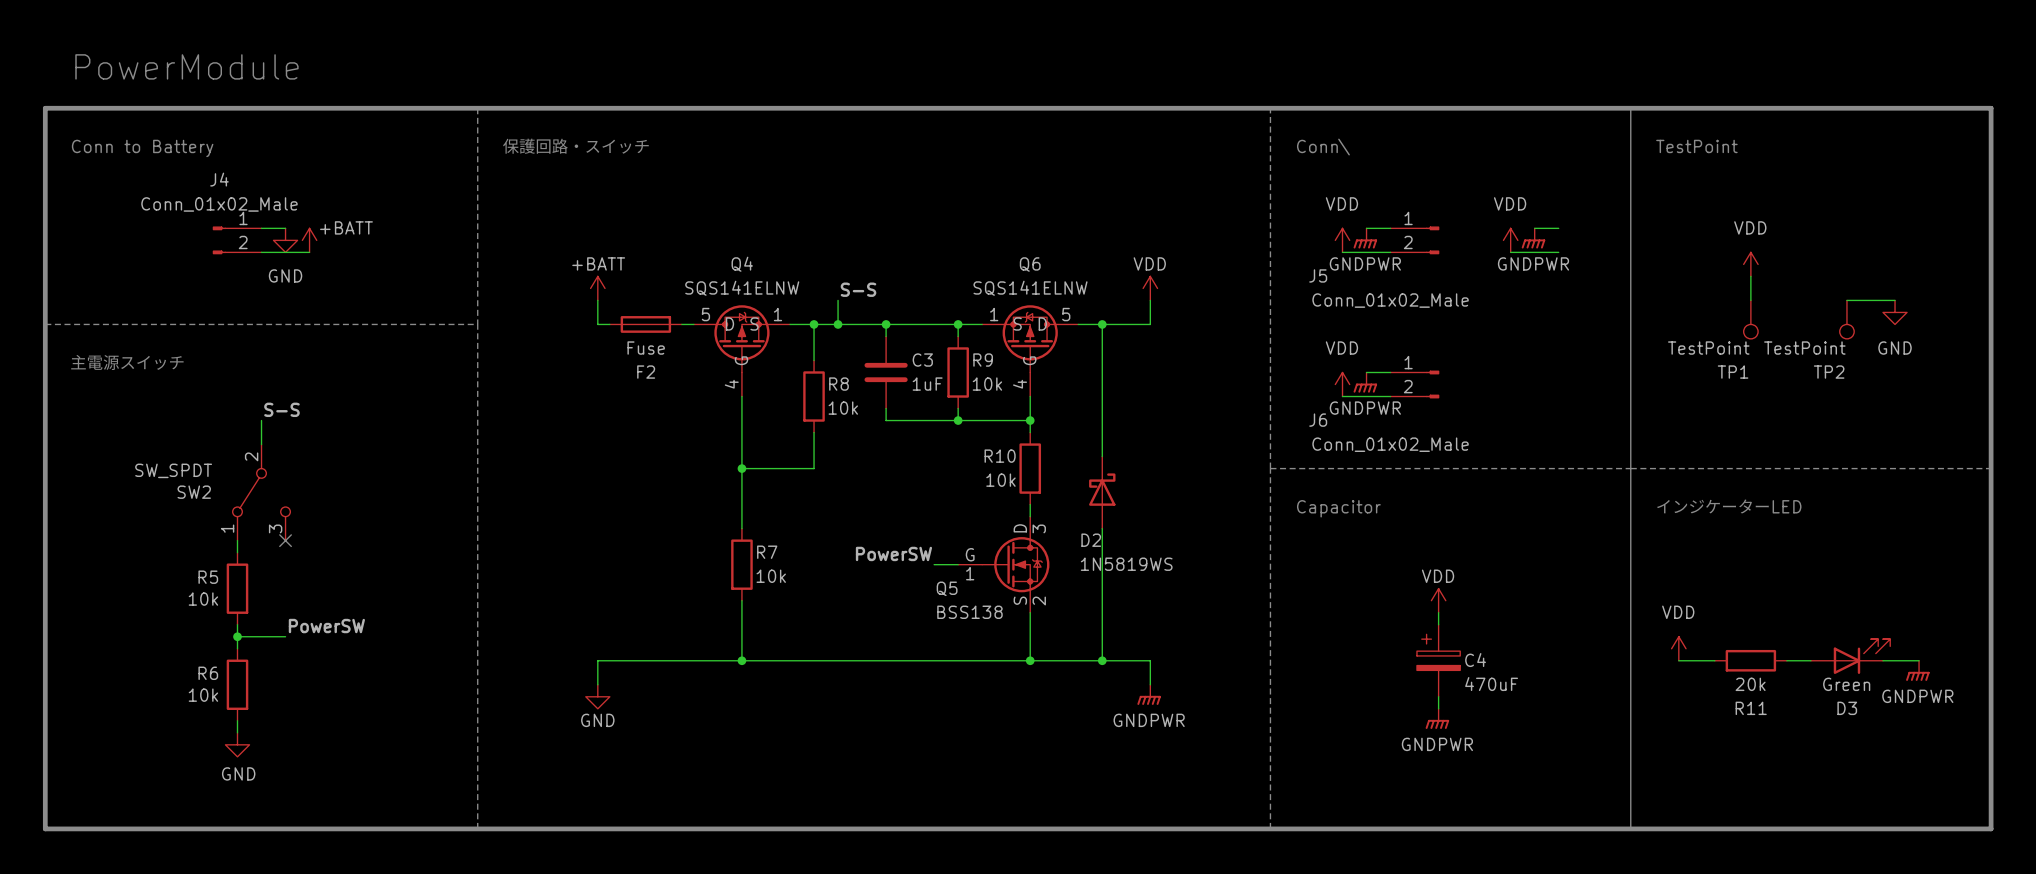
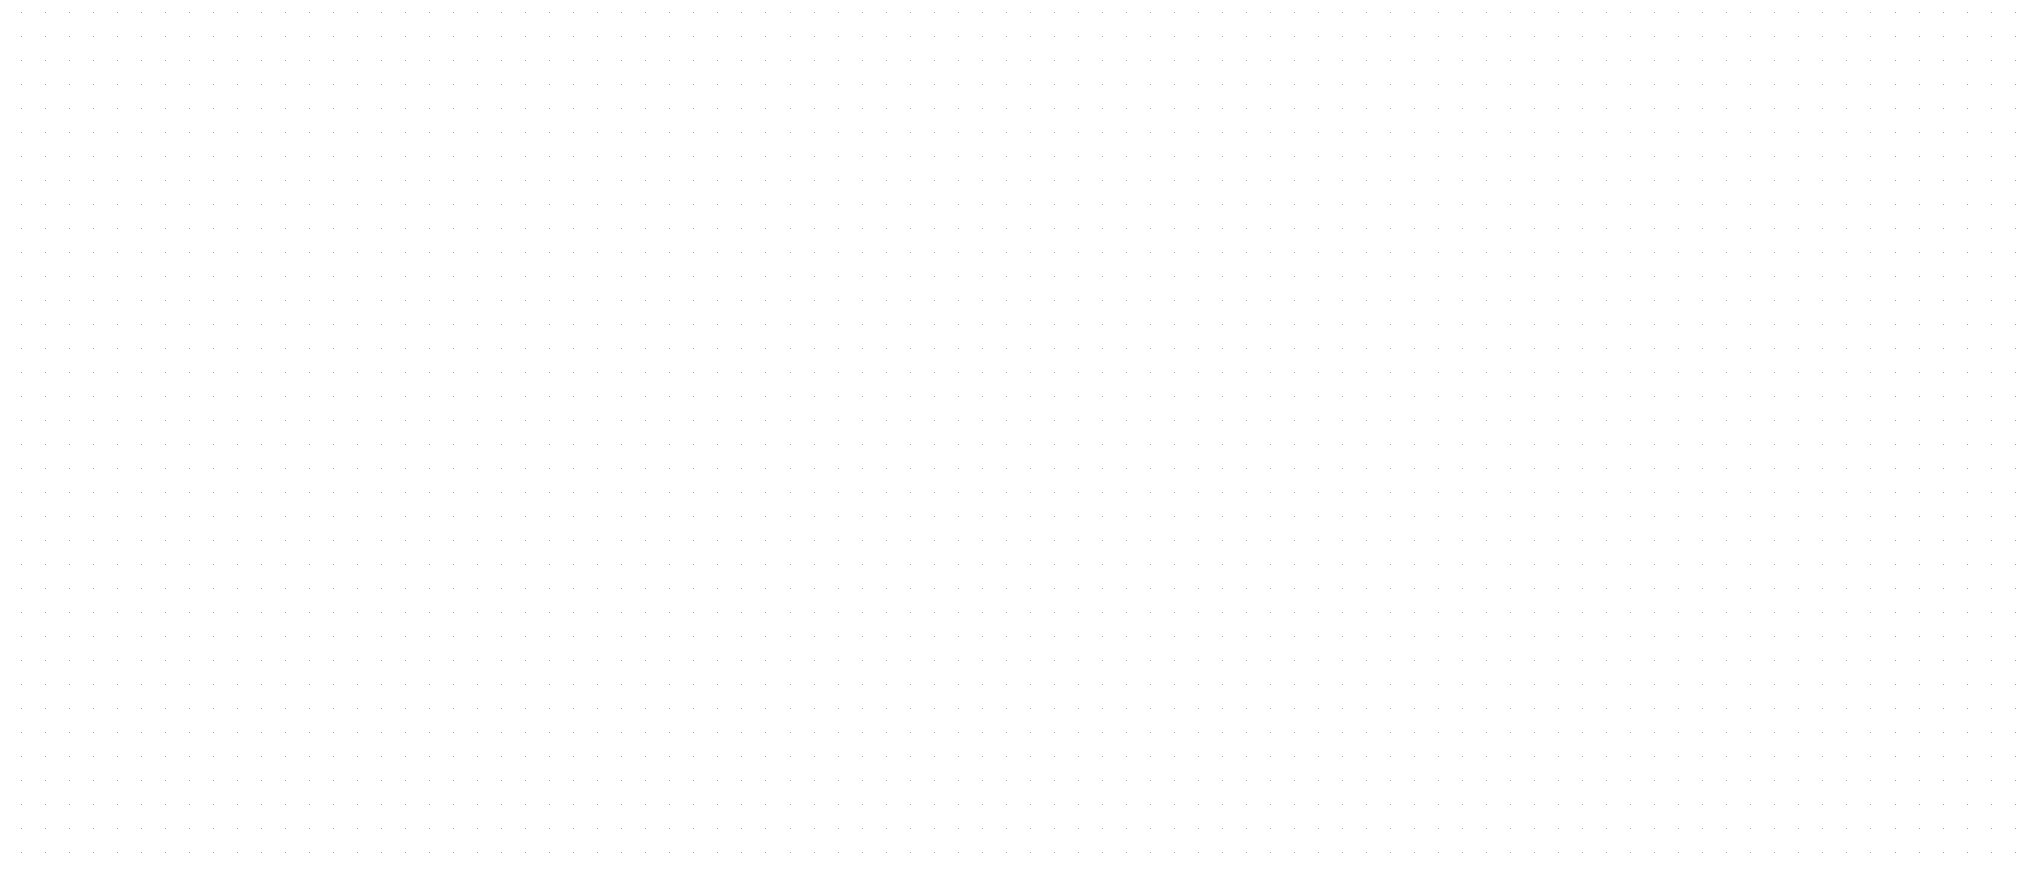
text: PowerModule (186, 66) -> none
line: (45, 108) (1991, 108) (1991, 828) (45, 828) (45, 108) -> none
line: (477, 108) (477, 828) -> none
line: (1270, 108) (1270, 828) -> none
line: (1630, 108) (1630, 828) -> none
text: 保護回路・スイッチ (575, 146) -> none
text: TestPoint (1696, 146) -> none
text: Conn\ (1323, 147) -> none
text: Conn to Battery (142, 148) -> none
wire: (261, 228) (285, 228) -> none
wire: (1366, 228) (1390, 228) -> none
wire: (1534, 228) (1558, 228) -> none
power symbol: GNDPWR (1365, 238) -> none
power symbol: GNDPWR (1533, 238) -> none
J4: Conn_01x02_Male (237, 240) -> none
power symbol: GND (285, 240) -> none
power symbol: +BATT (309, 240) -> none
power symbol: VDD (1342, 240) -> none
J5: Conn_01x02_Male (1414, 240) -> none
power symbol: VDD (1510, 240) -> none
wire: (261, 252) (309, 252) -> none
wire: (1342, 252) (1390, 252) -> none
wire: (1510, 252) (1558, 252) -> none
power symbol: VDD (1750, 264) -> none
wire: (1750, 276) (1750, 300) -> none
power symbol: +BATT (597, 288) -> none
power symbol: VDD (1150, 288) -> none
label: S-S (858, 289) -> none
wire: (597, 300) (597, 324) (609, 324) -> none
wire: (838, 300) (838, 324) -> none
wire: (1150, 300) (1150, 324) (1078, 324) -> none
wire: (1846, 300) (1895, 300) -> none
power symbol: GND (1895, 312) -> none
TP1: TestPoint (1750, 319) -> none
TP2: TestPoint (1846, 319) -> none
line: (45, 324) (477, 324) -> none
F2: Fuse (645, 324) -> none
wire: (681, 324) (693, 324) -> none
wire: (790, 324) (982, 324) -> none
wire: (814, 324) (814, 360) -> none
junction: (814, 324) -> none
junction: (838, 324) -> none
wire: (886, 324) (886, 336) -> none
junction: (886, 324) -> none
wire: (958, 324) (958, 336) -> none
junction: (958, 324) -> none
wire: (1102, 324) (1102, 456) -> none
junction: (1102, 324) -> none
Q4: SQS141ELNW (741, 350) -> none
Q6: SQS141ELNW (1030, 350) -> none
text: 主電源スイッチ (127, 362) -> none
C3: 1uF (886, 372) -> none
R9: 10k (958, 372) -> none
wire: (1366, 372) (1390, 372) -> none
power symbol: GNDPWR (1365, 382) -> none
power symbol: VDD (1342, 384) -> none
J6: Conn_01x02_Male (1414, 384) -> none
wire: (741, 396) (741, 528) -> none
R8: 10k (814, 396) -> none
wire: (1030, 396) (1030, 432) -> none
wire: (1342, 396) (1390, 396) -> none
wire: (886, 408) (886, 420) (1030, 420) -> none
wire: (958, 408) (958, 420) -> none
label: S-S (281, 409) -> none
wire: (261, 420) (261, 444) -> none
junction: (958, 420) -> none
junction: (1030, 420) -> none
wire: (814, 432) (814, 468) (741, 468) -> none
junction: (741, 468) -> none
R10: 10k (1030, 468) -> none
line: (1270, 468) (1991, 468) -> none
SW2: SW_SPDT (261, 492) -> none
D2: 1N5819WS (1102, 492) -> none
wire: (1030, 504) (1030, 516) -> none
text: インジケーターLED (1728, 506) -> none
text: Capacitor (1338, 508) -> none
wire: (1102, 528) (1102, 660) -> none
wire: (237, 540) (237, 552) -> none
no-connect mark: (285, 540) -> none
label: PowerSW (893, 553) -> none
R7: 10k (741, 564) -> none
wire: (934, 564) (958, 564) -> none
Q5: BSS138 (1003, 564) -> none
R5: 10k (237, 588) -> none
wire: (741, 600) (741, 660) -> none
power symbol: VDD (1438, 600) -> none
wire: (1030, 612) (1030, 660) -> none
wire: (1438, 612) (1438, 624) -> none
wire: (237, 624) (237, 648) -> none
label: PowerSW (326, 626) -> none
wire: (237, 636) (285, 636) -> none
junction: (237, 636) -> none
power symbol: VDD (1678, 648) -> none
D3: Green (1850, 656) -> none
junction: (741, 660) -> none
junction: (1030, 660) -> none
junction: (1102, 660) -> none
C4: 470uF (1438, 660) -> none
wire: (1678, 660) (1714, 660) -> none
R11: 20k (1750, 660) -> none
wire: (1786, 660) (1810, 660) -> none
wire: (1883, 660) (1919, 660) -> none
power symbol: GNDPWR (1917, 670) -> none
R6: 10k (237, 684) -> none
wire: (597, 684) (597, 660) (1150, 660) (1150, 684) -> none
power symbol: GNDPWR (1149, 694) -> none
power symbol: GND (597, 696) -> none
wire: (1438, 696) (1438, 708) -> none
power symbol: GNDPWR (1437, 718) -> none
wire: (237, 720) (237, 732) -> none
power symbol: GND (237, 744) -> none

